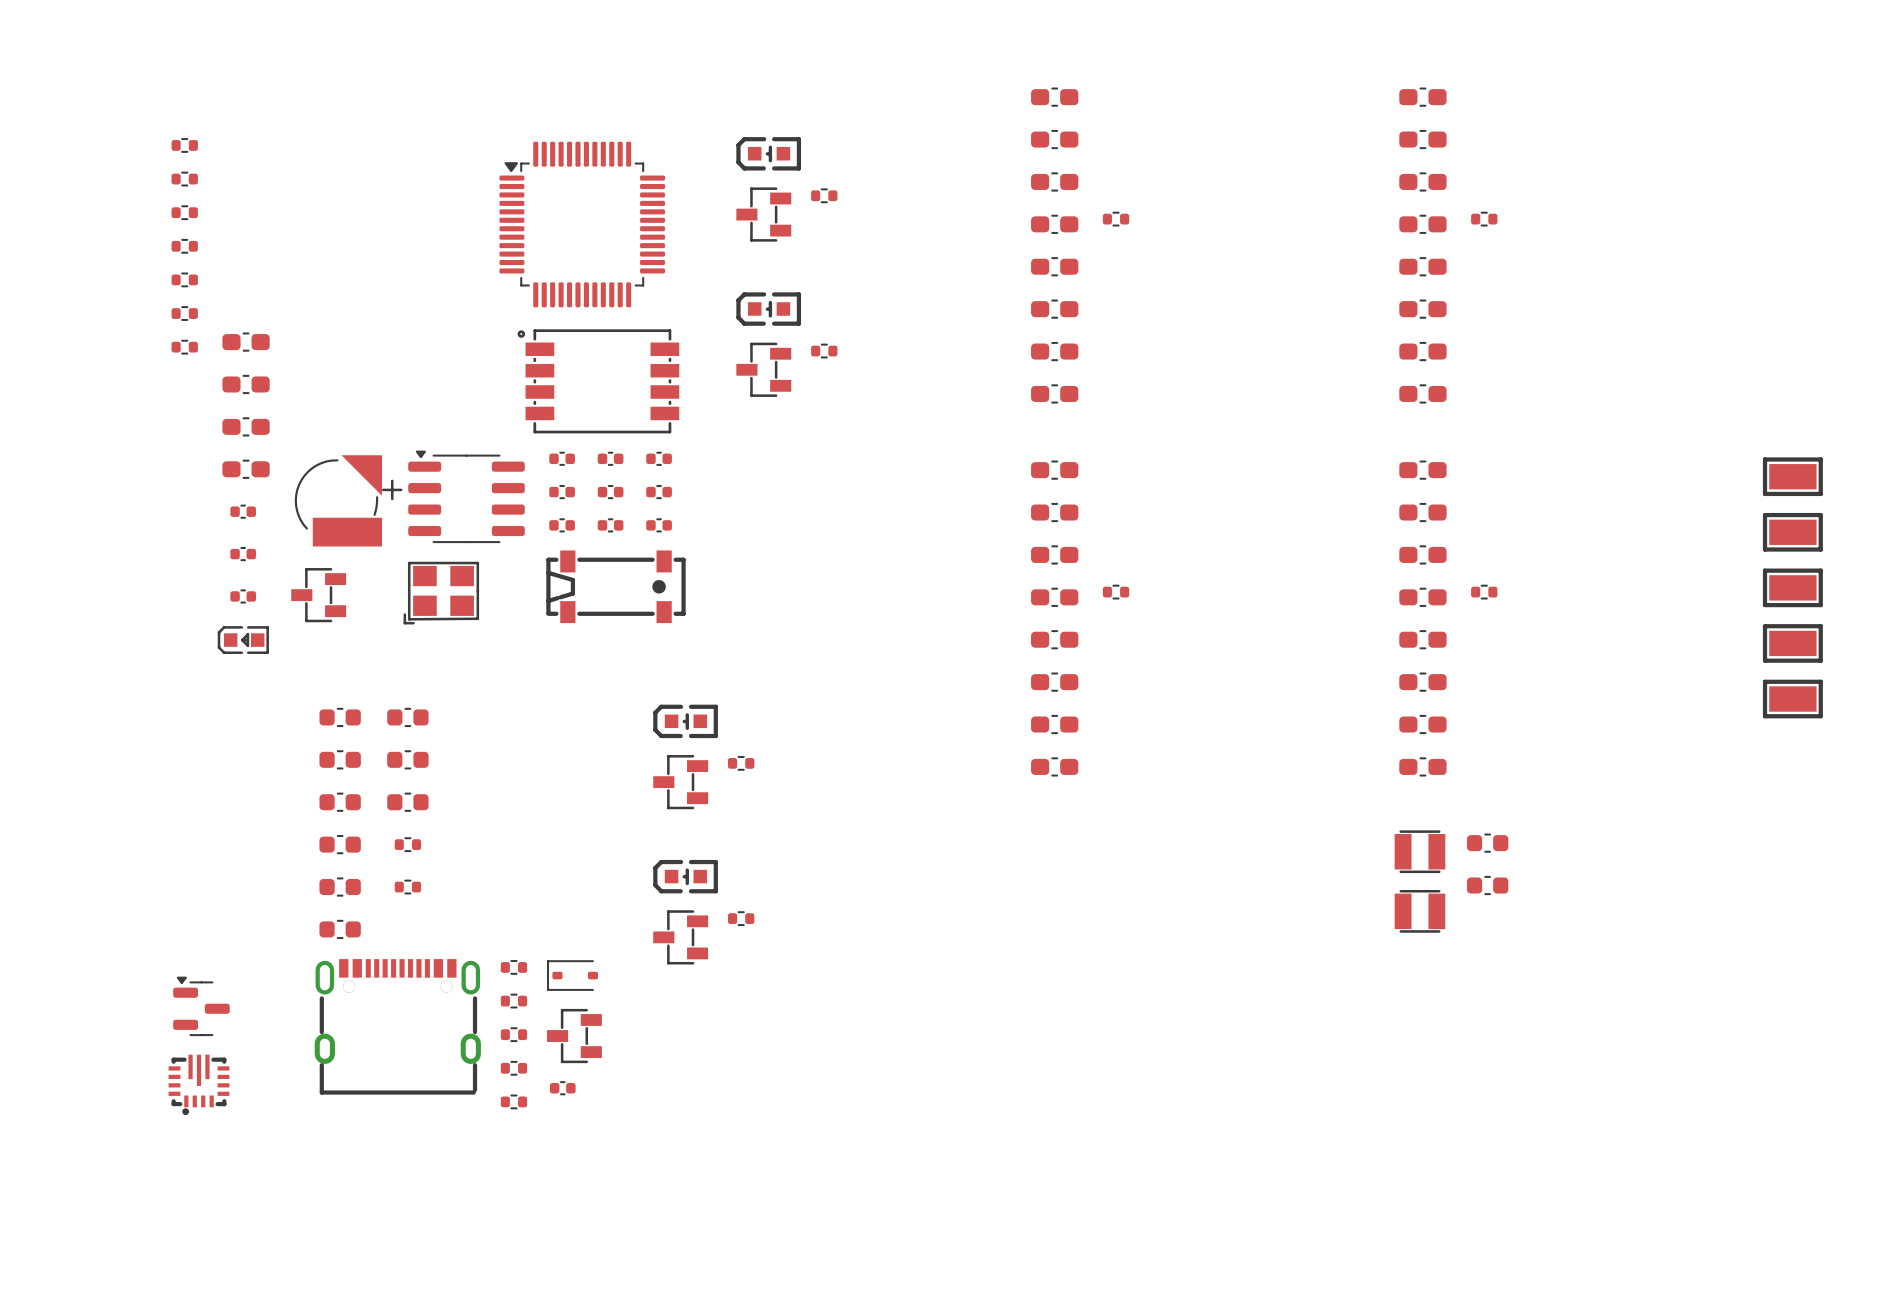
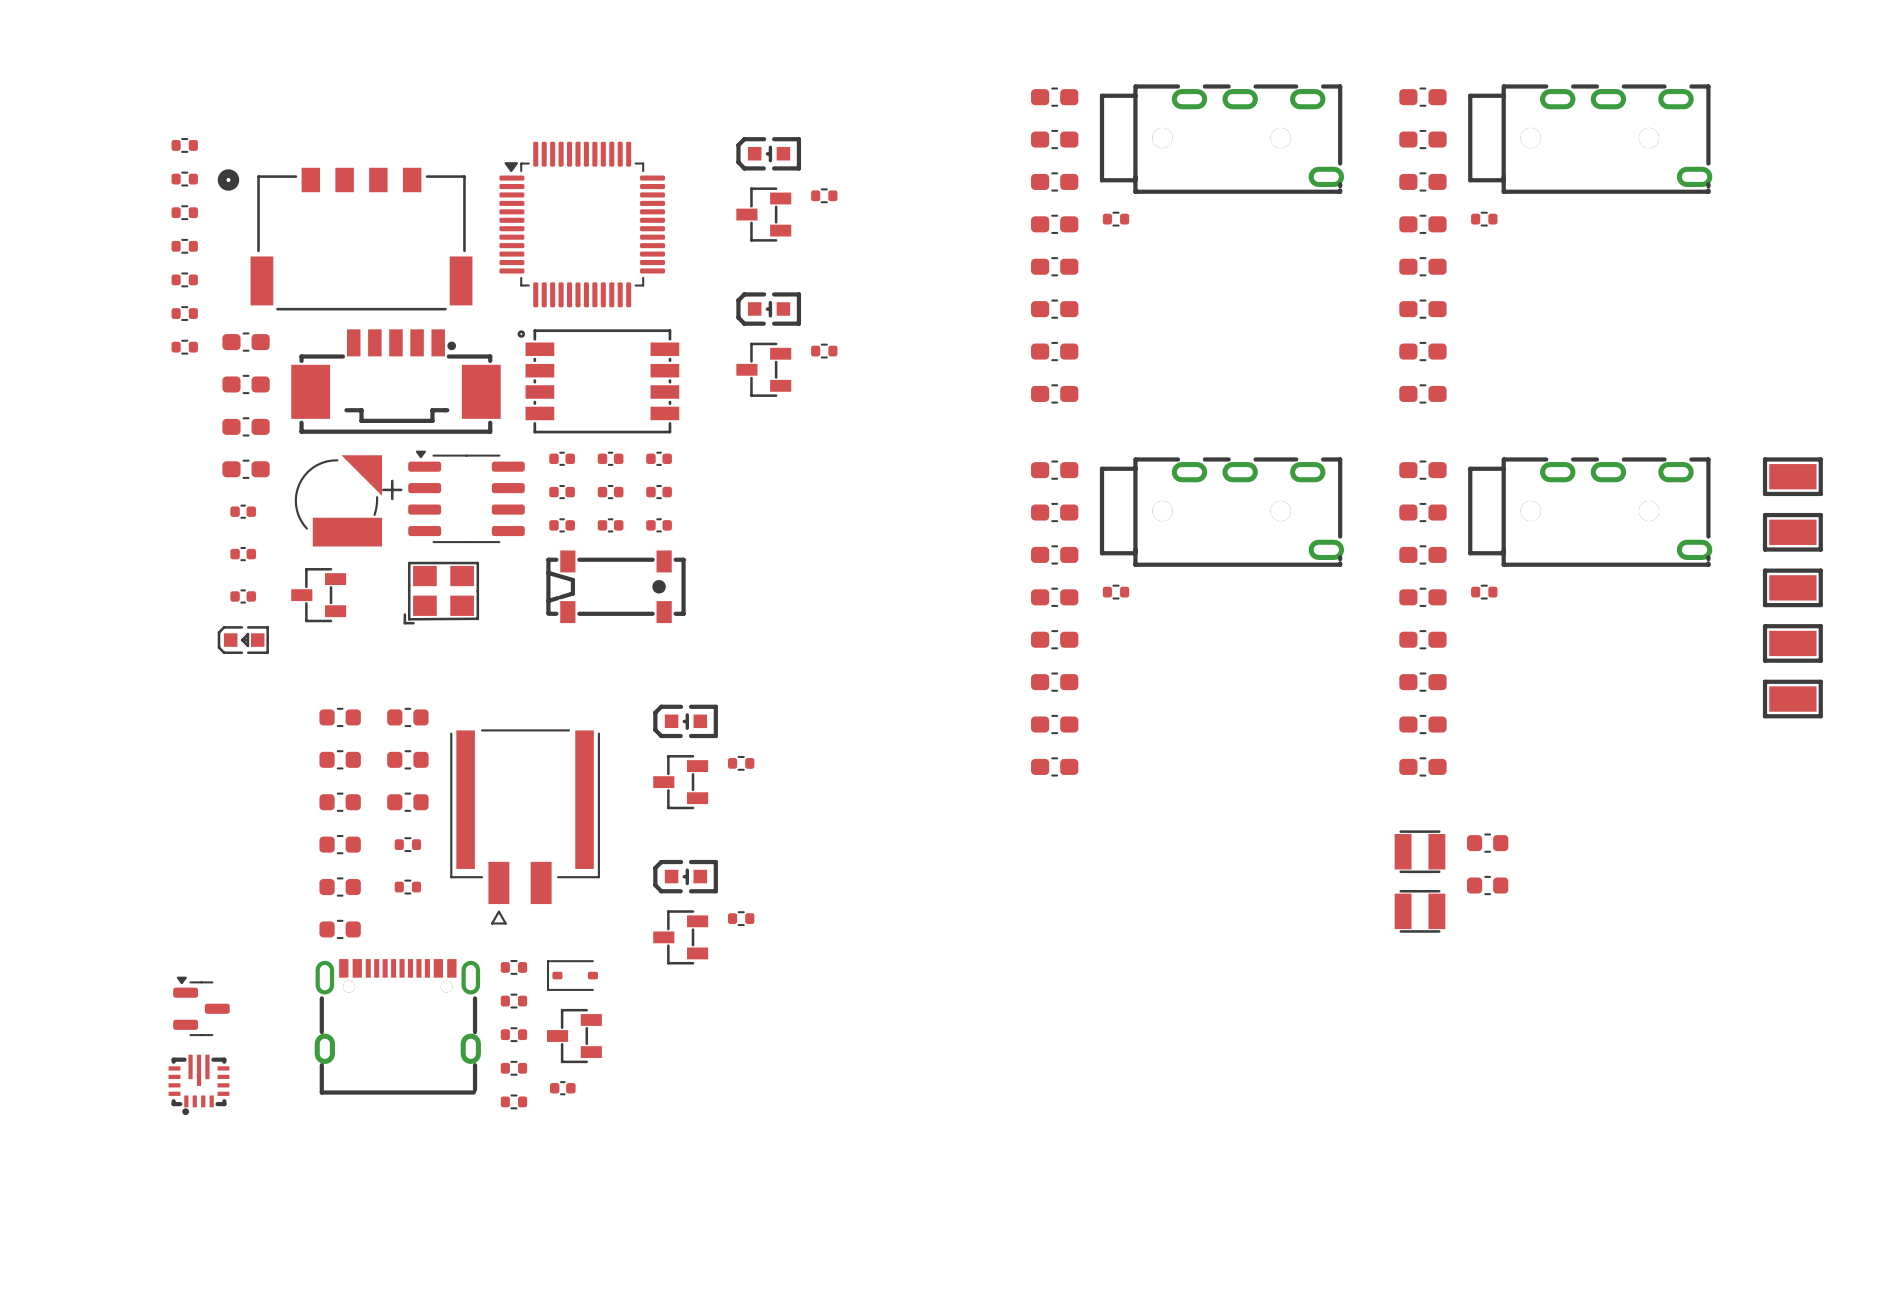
part: none -> (1221, 139)
part: none -> (1590, 139)
part: none -> (345, 239)
part: none -> (395, 381)
part: none -> (1221, 512)
part: none -> (1590, 512)
part: none -> (525, 826)

